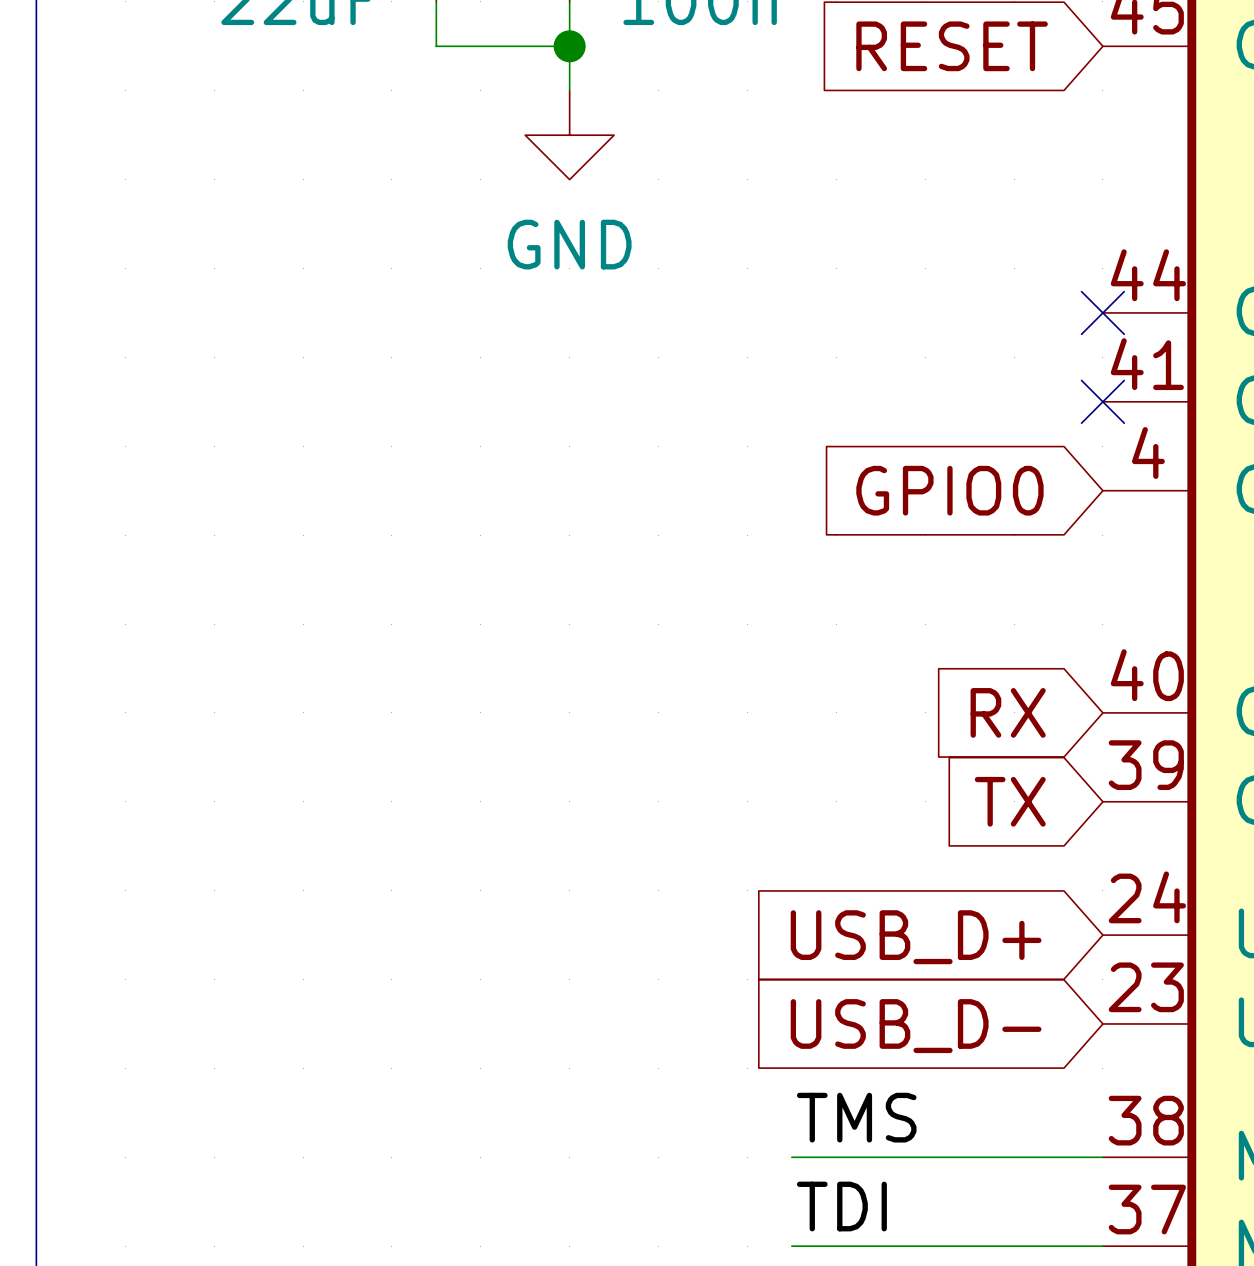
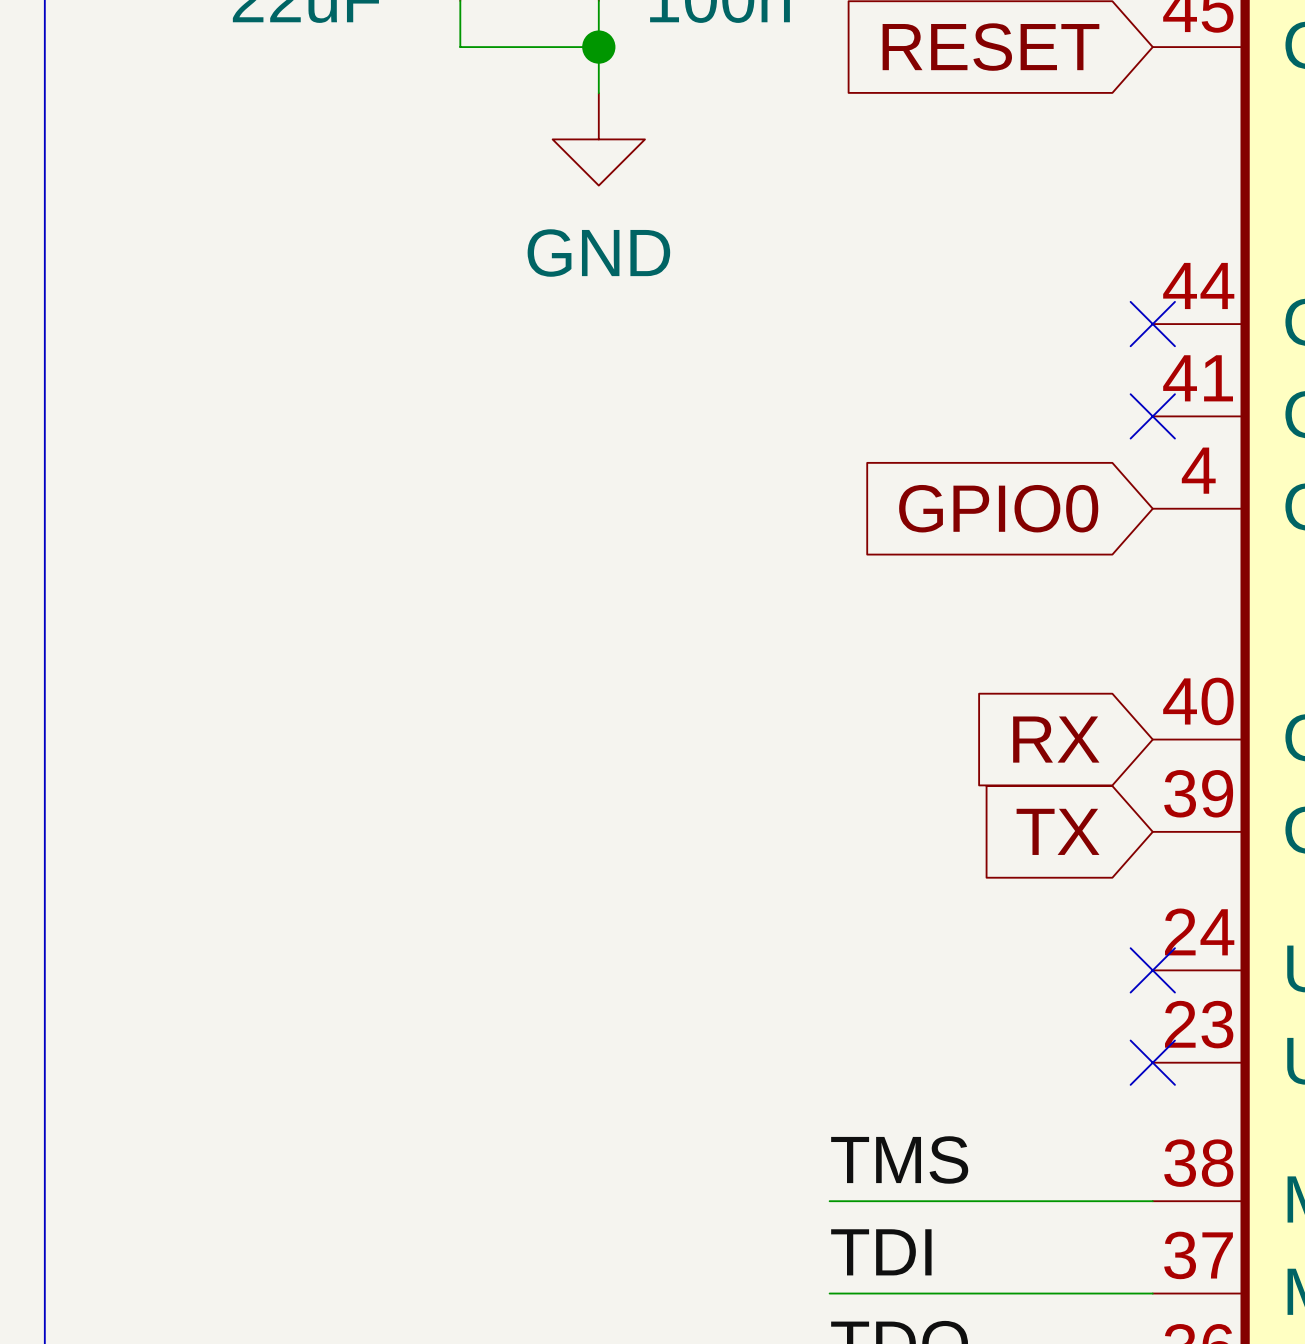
no-connect mark: none -> (1152, 970)
global label: USB_D+ (916, 937) -> none
no-connect mark: none -> (1152, 1062)
global label: USB_D- (916, 1026) -> none

